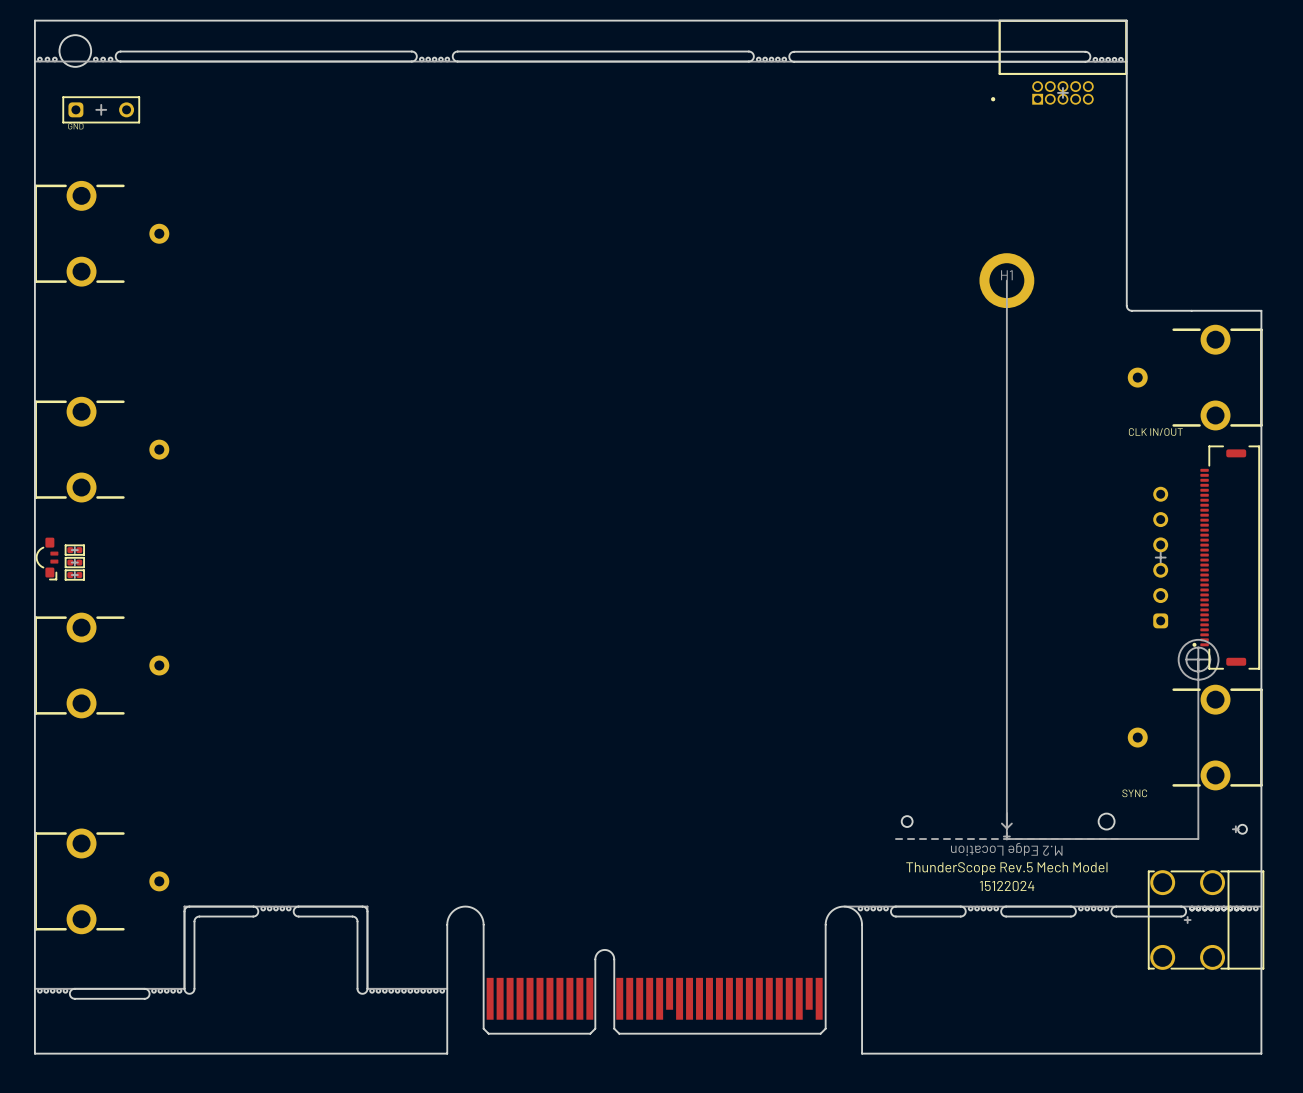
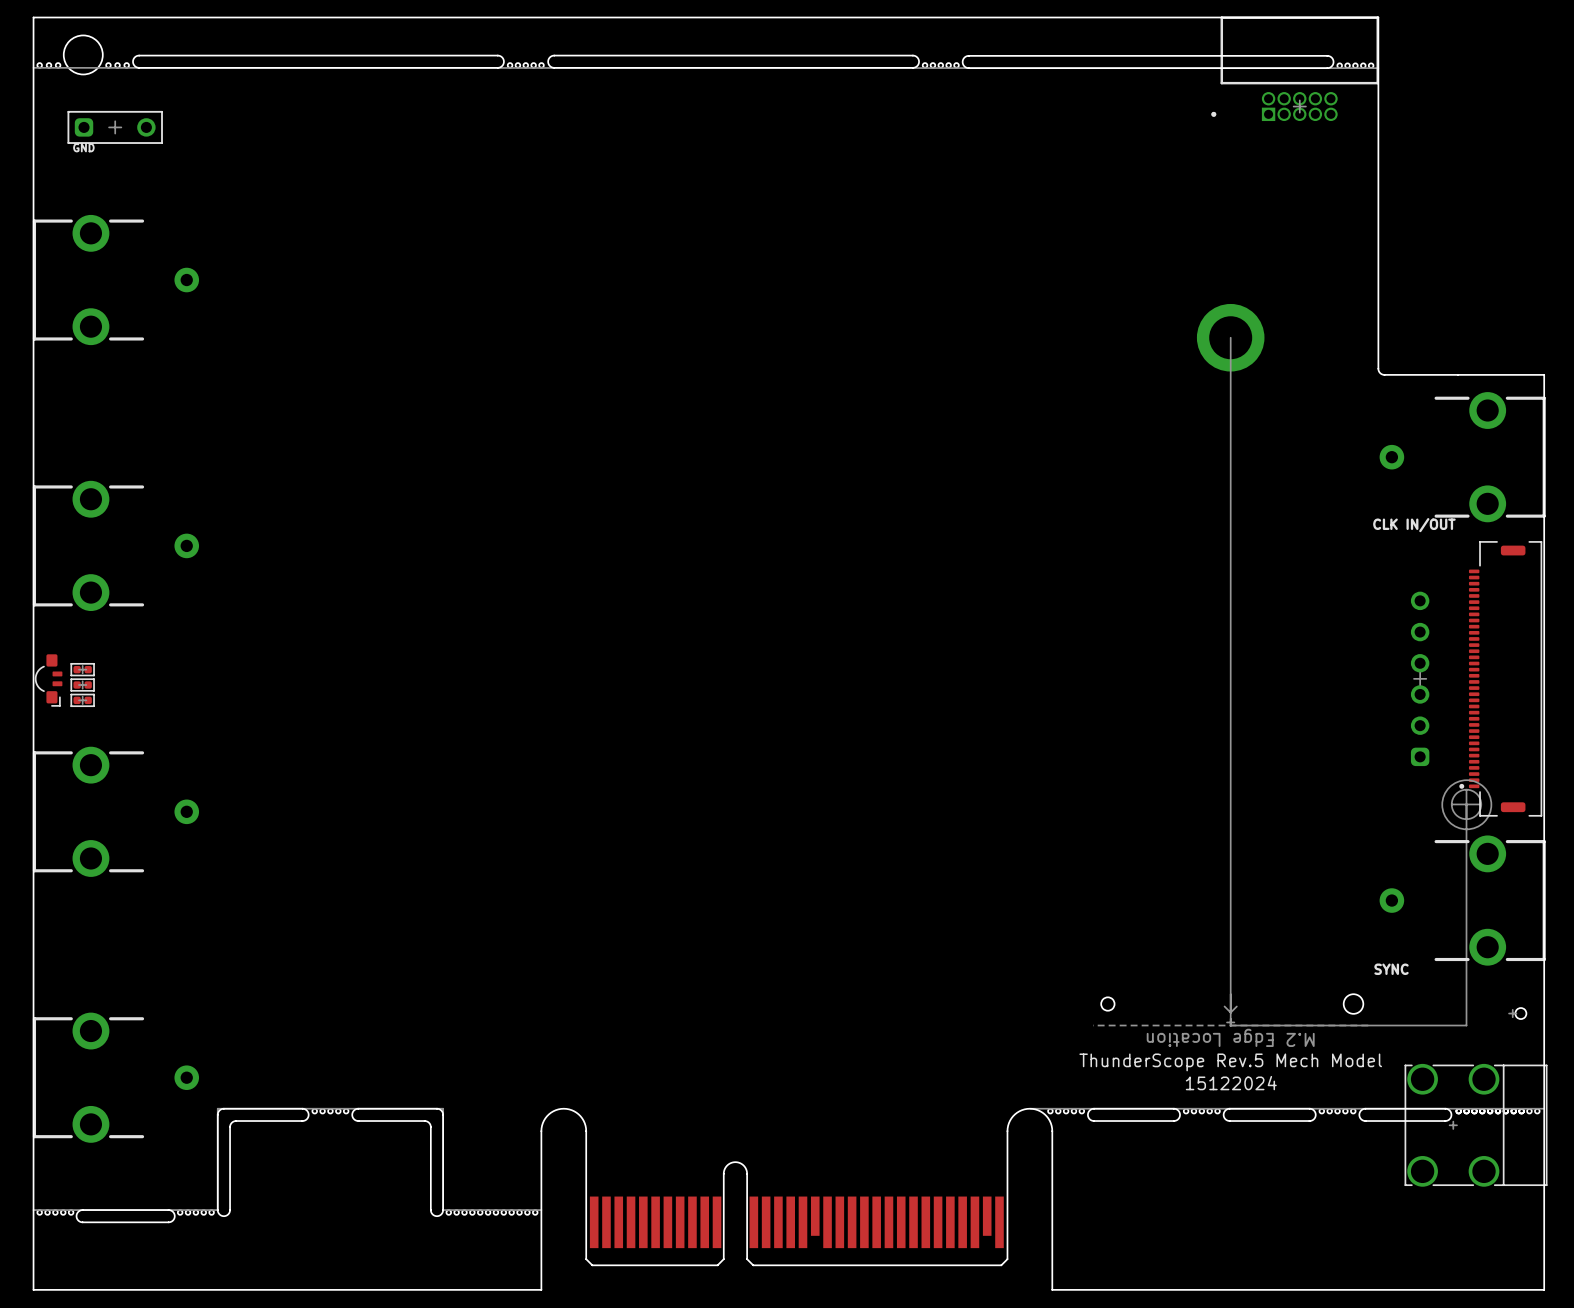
H1 name: H1 (1006, 275) -> none

